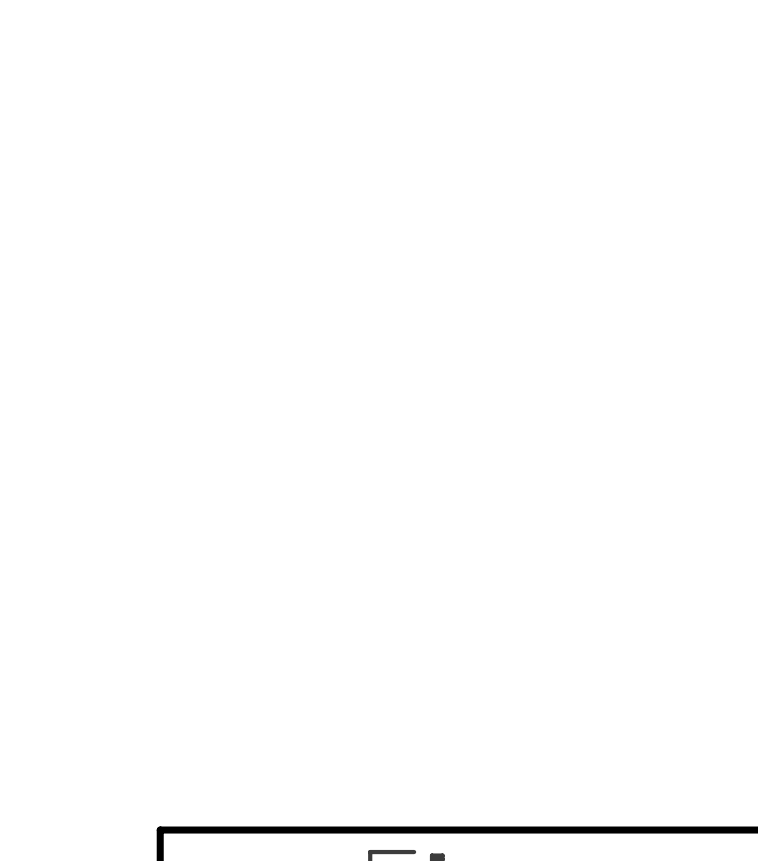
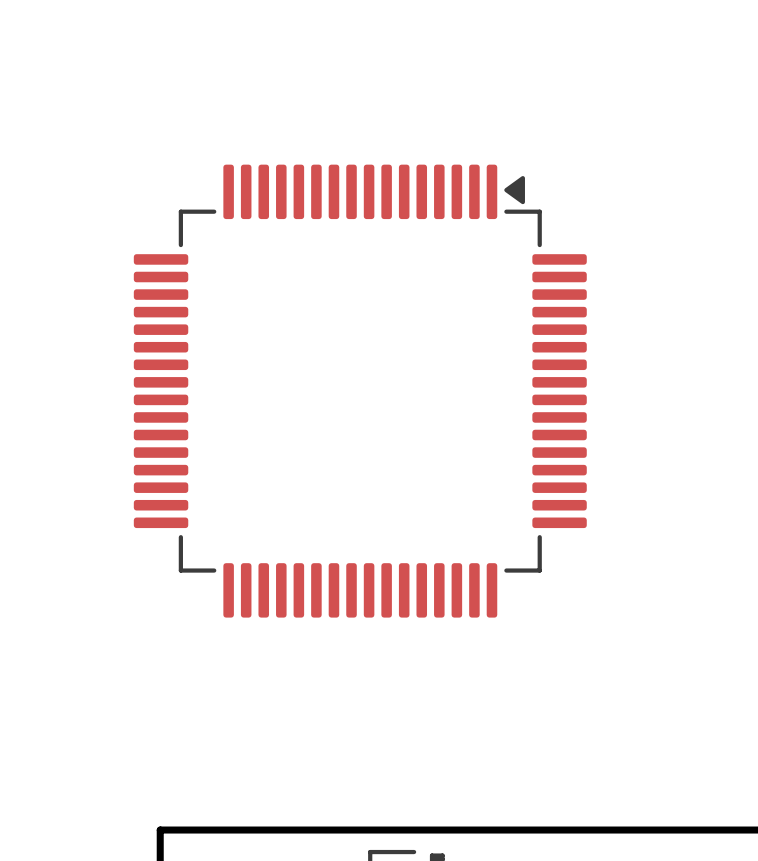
part: none -> (360, 391)

